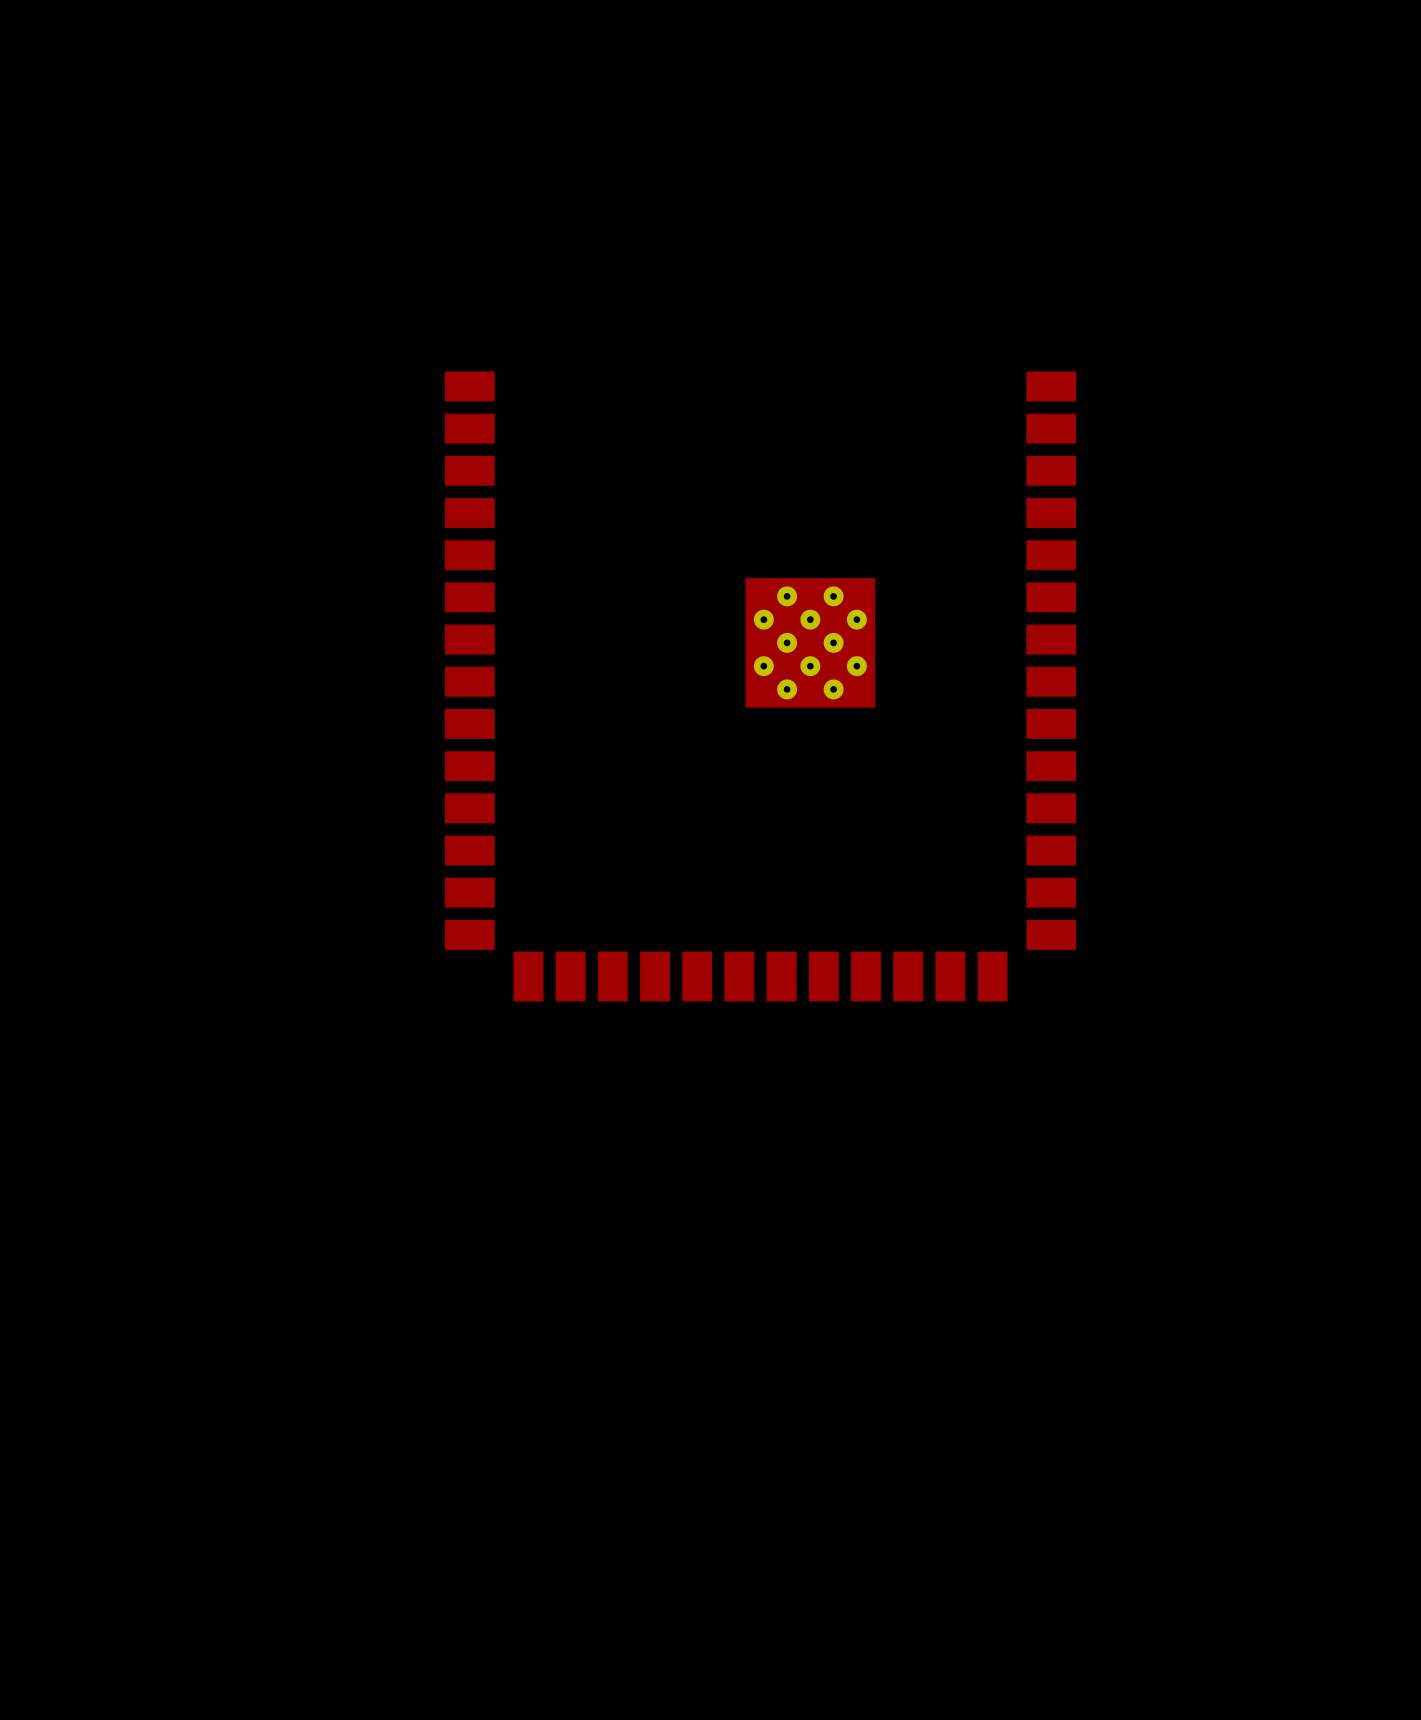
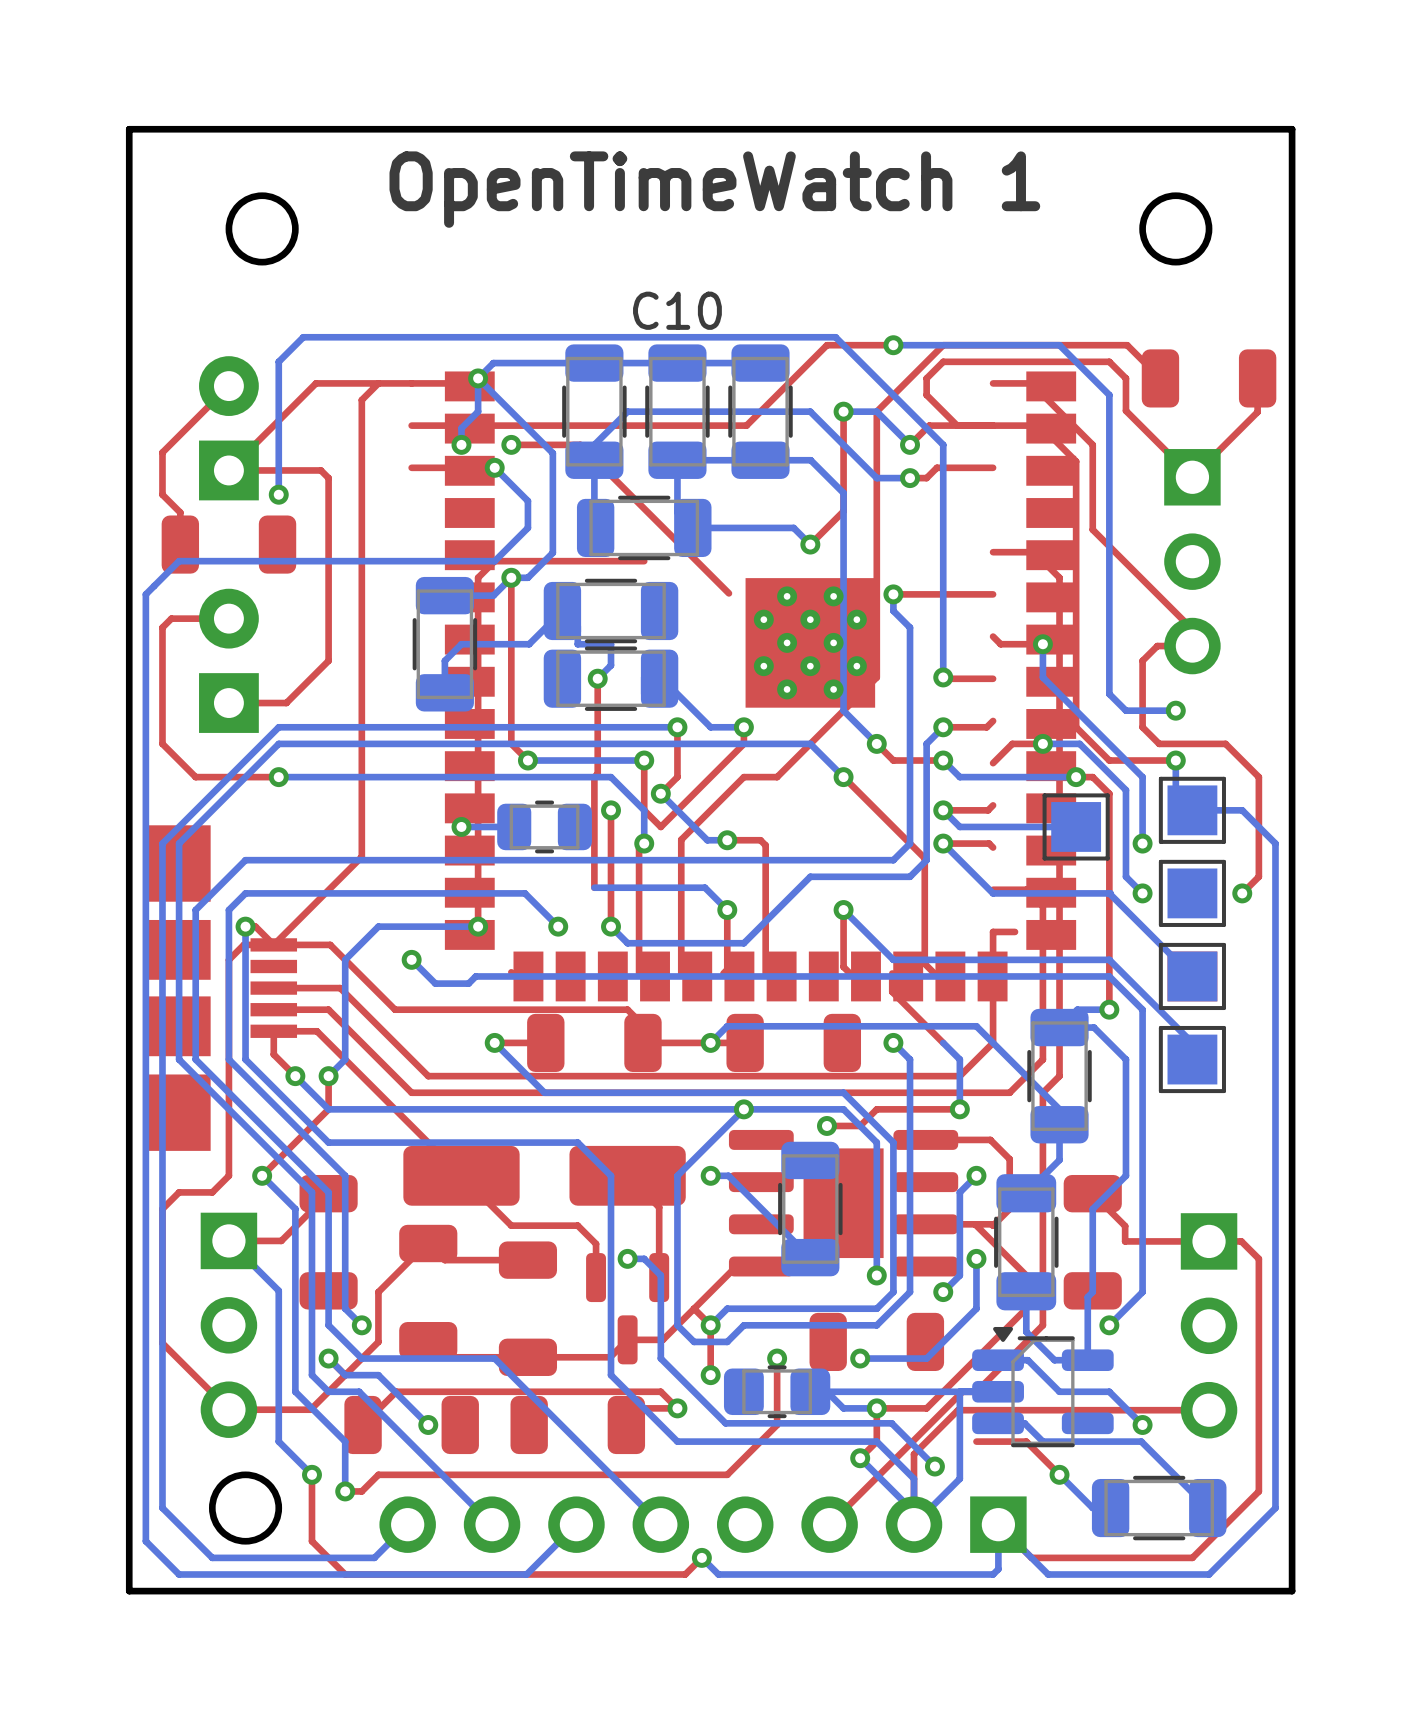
board edge: none -> (1292, 129) (129, 129) (129, 1591) (1292, 1591) (1292, 129)
text: none -> OpenTimeWatch 1 (714, 189)
round board edge: none -> [225, 192, 299, 266]
round board edge: none -> [1139, 192, 1213, 266]
text: none -> C10 (677, 310)
top track: none -> (893, 345) (826, 345) (746, 425) (411, 425)
bottom track: none -> (893, 345) (1059, 345) (1109, 395) (1109, 694) (1125, 710) (1175, 710)
via: none -> (893, 345)
bottom track: none -> (760, 363) (493, 363) (478, 378)
top track: none -> (478, 378) (473, 383) (315, 383) (228, 470) (320, 470) (328, 478) (328, 660) (286, 703) (228, 703)
bottom track: none -> (478, 378) (478, 411) (461, 428) (461, 444)
bottom track: none -> (478, 378) (552, 453) (552, 552) (527, 577) (511, 577) (493, 595) (444, 595)
via: none -> (478, 378)
top track: none -> (1160, 378) (1127, 345) (943, 345) (876, 411) (876, 677) (777, 777) (743, 777) (681, 839) (681, 973)
part: none -> (1209, 378)
top track: none -> (1257, 378) (1257, 412) (1192, 477) (1125, 410) (1125, 378) (1109, 361) (943, 361) (926, 378) (926, 395) (957, 425)
top track: none -> (378, 383) (361, 400) (361, 856) (273, 944) (255, 926) (245, 926)
top track: none -> (993, 383) (1031, 383) (1092, 444) (1092, 529) (1192, 629)
top track: none -> (228, 386) (162, 452) (162, 494) (180, 512) (180, 544)
part: none -> (594, 411)
part: none -> (677, 411)
part: none -> (760, 411)
top track: none -> (843, 411) (843, 511) (810, 544)
bottom track: none -> (843, 411) (876, 411) (910, 444)
via: none -> (843, 411)
part: none -> (228, 428)
via: none -> (461, 444)
top track: none -> (511, 444) (580, 444) (728, 593)
via: none -> (511, 444)
top track: none -> (910, 444) (929, 425) (1040, 425) (1076, 461) (1076, 727) (1109, 760) (1175, 760)
via: none -> (910, 444)
top track: none -> (494, 467) (411, 467)
bottom track: none -> (494, 467) (527, 501) (527, 527) (494, 561) (179, 561) (145, 594) (145, 1541) (179, 1574) (526, 1574) (576, 1524)
via: none -> (494, 467)
top track: none -> (993, 467) (936, 467) (926, 478) (910, 478)
bottom track: none -> (910, 478) (876, 478) (810, 411) (627, 411) (594, 444) (595, 527)
via: none -> (910, 478)
bottom track: none -> (278, 494) (278, 361) (303, 337) (835, 337) (943, 444) (943, 677)
via: none -> (278, 494)
part: none -> (644, 527)
part: none -> (228, 544)
bottom track: none -> (810, 544) (793, 527) (692, 527) (677, 512) (677, 460) (810, 460) (843, 493) (843, 710) (876, 743)
via: none -> (810, 544)
top track: none -> (993, 552) (1033, 552) (1059, 577) (1059, 1076) (1042, 1092) (1042, 1325) (976, 1391) (962, 1391) (829, 1524)
top track: none -> (644, 561) (494, 561) (478, 577) (478, 926)
part: none -> (1192, 561)
top track: none -> (511, 577) (511, 743) (527, 760)
via: none -> (511, 577)
bottom track: none -> (893, 594) (893, 611) (910, 627) (910, 843) (893, 860) (245, 860) (195, 910) (195, 1059) (328, 1192) (328, 1325) (361, 1358) (494, 1358) (660, 1524)
via: none -> (893, 594)
top track: none -> (993, 594) (893, 594)
part: none -> (611, 611)
top track: none -> (228, 618) (171, 618) (162, 627) (162, 743) (195, 777) (278, 777)
top track: none -> (993, 636) (1000, 644) (1042, 644)
part: none -> (444, 644)
bottom track: none -> (1042, 644) (1042, 677) (1142, 777) (1142, 843)
via: none -> (1042, 644)
top track: none -> (1192, 646) (1157, 646) (1142, 660) (1142, 727) (1159, 743) (1225, 743) (1258, 777) (1258, 876) (1242, 893)
part: none -> (228, 660)
top track: none -> (943, 677) (993, 678)
via: none -> (943, 677)
top track: none -> (597, 678) (597, 773) (594, 777) (594, 887)
bottom track: none -> (597, 678) (611, 665) (611, 644) (577, 644) (577, 626) (562, 611) (529, 644) (461, 644) (444, 660) (444, 692)
via: none -> (597, 678)
part: none -> (611, 678)
bottom track: none -> (644, 694) (644, 677) (660, 677) (710, 727) (743, 727)
via: none -> (1175, 710)
top track: none -> (993, 720) (986, 727) (943, 727)
top track: none -> (677, 727) (677, 777) (660, 793)
bottom track: none -> (677, 727) (278, 727) (162, 843) (162, 1508) (212, 1557) (374, 1557) (407, 1524)
via: none -> (677, 727)
top track: none -> (743, 727) (743, 743) (660, 826) (644, 810) (644, 760)
via: none -> (743, 727)
bottom track: none -> (943, 727) (926, 743) (926, 860) (910, 876) (810, 876) (743, 943) (627, 943) (611, 926)
via: none -> (943, 727)
top track: none -> (876, 743) (893, 760) (943, 760)
via: none -> (876, 743)
top track: none -> (1042, 743) (1012, 743) (993, 763)
bottom track: none -> (1042, 743) (1079, 743) (1125, 790) (1125, 876) (1142, 893)
via: none -> (1042, 743)
via: none -> (527, 760)
bottom track: none -> (644, 760) (527, 760)
via: none -> (644, 760)
bottom track: none -> (943, 760) (959, 777) (1076, 777)
via: none -> (943, 760)
bottom track: none -> (1175, 760) (1175, 793) (1192, 810) (1242, 810) (1275, 843) (1275, 1508) (1209, 1574) (1048, 1574) (998, 1524) (998, 1569) (993, 1574) (718, 1574) (701, 1557)
via: none -> (1175, 760)
bottom track: none -> (278, 777) (611, 777) (644, 810) (644, 843)
via: none -> (278, 777)
top track: none -> (843, 777) (924, 858) (924, 963) (934, 973)
bottom track: none -> (843, 777) (810, 743) (278, 743) (179, 843) (179, 1059) (311, 1192) (311, 1375) (328, 1391) (359, 1391) (492, 1524)
via: none -> (843, 777)
top track: none -> (1076, 777) (1092, 777) (1109, 793) (1109, 1009)
via: none -> (1076, 777)
bottom track: none -> (660, 793) (707, 840) (727, 840)
via: none -> (660, 793)
top track: none -> (993, 805) (988, 810) (943, 810)
top track: none -> (611, 810) (611, 926)
via: none -> (611, 810)
bottom track: none -> (943, 810) (959, 826) (1076, 826)
via: none -> (943, 810)
part: none -> (1192, 810)
via: none -> (461, 826)
bottom track: none -> (514, 826) (461, 826)
part: none -> (544, 826)
part: none -> (1076, 826)
top track: none -> (727, 840) (760, 840) (765, 845) (765, 973)
via: none -> (727, 840)
top track: none -> (644, 843) (639, 848) (639, 973)
via: none -> (644, 843)
top track: none -> (943, 843) (989, 843) (993, 847)
bottom track: none -> (943, 843) (993, 893) (1110, 893)
via: none -> (943, 843)
via: none -> (1142, 843)
bottom track: none -> (594, 887) (704, 887) (727, 910)
top track: none -> (993, 889) (1026, 889) (1042, 906) (1042, 1059) (1009, 1092) (411, 1092) (328, 1009) (273, 1009)
bottom track: none -> (1109, 893) (1192, 976)
via: none -> (1142, 893)
part: none -> (1192, 893)
via: none -> (1242, 893)
top track: none -> (727, 910) (727, 969) (723, 973)
via: none -> (727, 910)
top track: none -> (843, 910) (843, 967) (850, 973)
bottom track: none -> (843, 910) (893, 959) (1109, 959) (1192, 1042) (1192, 1059)
via: none -> (843, 910)
bottom track: none -> (245, 926) (245, 1059) (328, 1142) (577, 1142) (611, 1175) (611, 1375) (677, 1441) (876, 1441) (914, 1478) (914, 1524) (959, 1478) (959, 1391)
via: none -> (245, 926)
bottom track: none -> (478, 926) (378, 926) (345, 959) (345, 1059) (328, 1076)
via: none -> (478, 926)
bottom track: none -> (558, 926) (525, 893) (245, 893) (228, 910) (228, 1059) (345, 1175) (345, 1308) (361, 1325)
via: none -> (558, 926)
via: none -> (611, 926)
top track: none -> (1015, 931) (993, 931) (993, 1042) (959, 1076) (428, 1076) (340, 988) (273, 988)
bottom track: none -> (411, 959) (435, 983) (468, 983) (475, 976) (1109, 976) (1142, 1009) (1142, 1292) (1109, 1325)
via: none -> (411, 959)
top track: none -> (511, 972) (512, 973)
top track: none -> (892, 973) (892, 991) (943, 1042)
part: none -> (1192, 976)
part: none -> (222, 988)
bottom track: none -> (1109, 1009) (1077, 1009) (1059, 1027) (1093, 1027) (1125, 1059) (1125, 1175) (1092, 1209) (1092, 1292) (1087, 1297) (1087, 1360) (1054, 1360) (1026, 1331) (1026, 1291)
via: none -> (1109, 1009)
bottom track: none -> (494, 1042) (544, 1092) (843, 1092) (893, 1142) (893, 1292) (876, 1308) (727, 1308) (710, 1325)
via: none -> (494, 1042)
top track: none -> (545, 1042) (494, 1042)
part: none -> (594, 1042)
bottom track: none -> (710, 1042) (727, 1026) (976, 1026) (1059, 1109) (1059, 1160) (1026, 1193)
via: none -> (710, 1042)
top track: none -> (745, 1042) (642, 1042) (642, 1024) (627, 1009) (395, 1009) (330, 944) (243, 944) (228, 959) (228, 1175) (212, 1192) (179, 1192) (162, 1209) (162, 1343) (228, 1409) (310, 1409) (378, 1341) (378, 1292) (427, 1243) (444, 1260) (527, 1260)
part: none -> (793, 1042)
bottom track: none -> (893, 1042) (910, 1059) (910, 1292) (876, 1325) (743, 1325) (727, 1341) (694, 1341) (677, 1325) (677, 1175) (743, 1109)
via: none -> (893, 1042)
bottom track: none -> (943, 1042) (959, 1059) (959, 1109)
part: none -> (1192, 1059)
top track: none -> (295, 1076) (273, 1054) (273, 1031) (316, 1031) (511, 1225) (577, 1225) (596, 1243) (596, 1277)
bottom track: none -> (295, 1076) (328, 1109) (843, 1109) (876, 1142) (876, 1275)
via: none -> (295, 1076)
top track: none -> (328, 1076) (328, 1109) (262, 1175)
via: none -> (328, 1076)
part: none -> (1059, 1076)
via: none -> (743, 1109)
top track: none -> (959, 1109) (876, 1109) (860, 1125) (826, 1125)
via: none -> (959, 1109)
via: none -> (826, 1125)
top track: none -> (925, 1139) (990, 1139) (1009, 1159) (1009, 1209) (993, 1225) (925, 1224)
bottom track: none -> (262, 1175) (295, 1209) (295, 1391) (345, 1441) (345, 1491)
via: none -> (262, 1175)
part: none -> (544, 1175)
top track: none -> (627, 1175) (659, 1207) (659, 1277)
bottom track: none -> (710, 1175) (728, 1175) (810, 1257)
via: none -> (710, 1175)
bottom track: none -> (976, 1175) (959, 1192) (959, 1275) (943, 1292)
via: none -> (976, 1175)
top track: none -> (328, 1193) (281, 1240) (228, 1240)
top track: none -> (1092, 1193) (1125, 1226) (1125, 1241) (1241, 1241) (1258, 1258) (1258, 1491) (1192, 1557) (1031, 1557) (998, 1524)
part: none -> (843, 1203)
part: none -> (810, 1209)
top track: none -> (975, 1224) (1026, 1275) (1026, 1308) (926, 1408) (876, 1408) (876, 1441) (860, 1458)
bottom track: none -> (228, 1240) (278, 1290) (278, 1441) (311, 1474)
part: none -> (328, 1242)
part: none -> (1026, 1242)
part: none -> (1092, 1242)
bottom track: none -> (627, 1258) (644, 1258) (660, 1275) (660, 1358) (725, 1423) (891, 1423) (934, 1466)
via: none -> (627, 1258)
bottom track: none -> (976, 1258) (976, 1308) (926, 1358) (860, 1358)
via: none -> (976, 1258)
top track: none -> (761, 1266) (736, 1266) (662, 1339) (627, 1339) (610, 1357) (444, 1357) (428, 1340)
via: none -> (876, 1275)
part: none -> (428, 1292)
via: none -> (943, 1292)
part: none -> (527, 1308)
part: none -> (627, 1308)
top track: none -> (694, 1308) (710, 1325) (710, 1375)
part: none -> (228, 1325)
via: none -> (361, 1325)
via: none -> (710, 1325)
via: none -> (1109, 1325)
part: none -> (1209, 1325)
part: none -> (876, 1341)
bottom track: none -> (328, 1358) (345, 1375) (378, 1375) (428, 1424)
via: none -> (328, 1358)
top track: none -> (777, 1358) (777, 1424) (727, 1474) (378, 1474) (361, 1491) (345, 1491)
via: none -> (777, 1358)
via: none -> (860, 1358)
bottom track: none -> (998, 1360) (1027, 1360) (1059, 1391) (1109, 1391) (1142, 1424)
via: none -> (710, 1375)
part: none -> (1042, 1387)
part: none -> (777, 1391)
bottom track: none -> (998, 1391) (826, 1391) (843, 1408) (876, 1408)
via: none -> (677, 1408)
via: none -> (876, 1408)
top track: none -> (1209, 1410) (958, 1410) (914, 1454) (914, 1524)
bottom track: none -> (998, 1423) (1024, 1423) (1042, 1441) (1141, 1441) (1207, 1508)
part: none -> (411, 1424)
via: none -> (428, 1424)
part: none -> (577, 1424)
top track: none -> (626, 1424) (642, 1408) (677, 1408) (660, 1391) (396, 1391) (363, 1424)
via: none -> (1142, 1424)
top track: none -> (976, 1441) (1026, 1441) (1059, 1474)
bottom track: none -> (860, 1458) (914, 1512)
via: none -> (860, 1458)
via: none -> (934, 1466)
round board edge: none -> [208, 1471, 283, 1545]
top track: none -> (311, 1474) (311, 1541) (345, 1574) (685, 1574) (701, 1557)
via: none -> (311, 1474)
bottom track: none -> (1059, 1474) (1092, 1508) (1110, 1508)
via: none -> (1059, 1474)
via: none -> (345, 1491)
part: none -> (1159, 1508)
part: none -> (703, 1524)
via: none -> (701, 1557)

